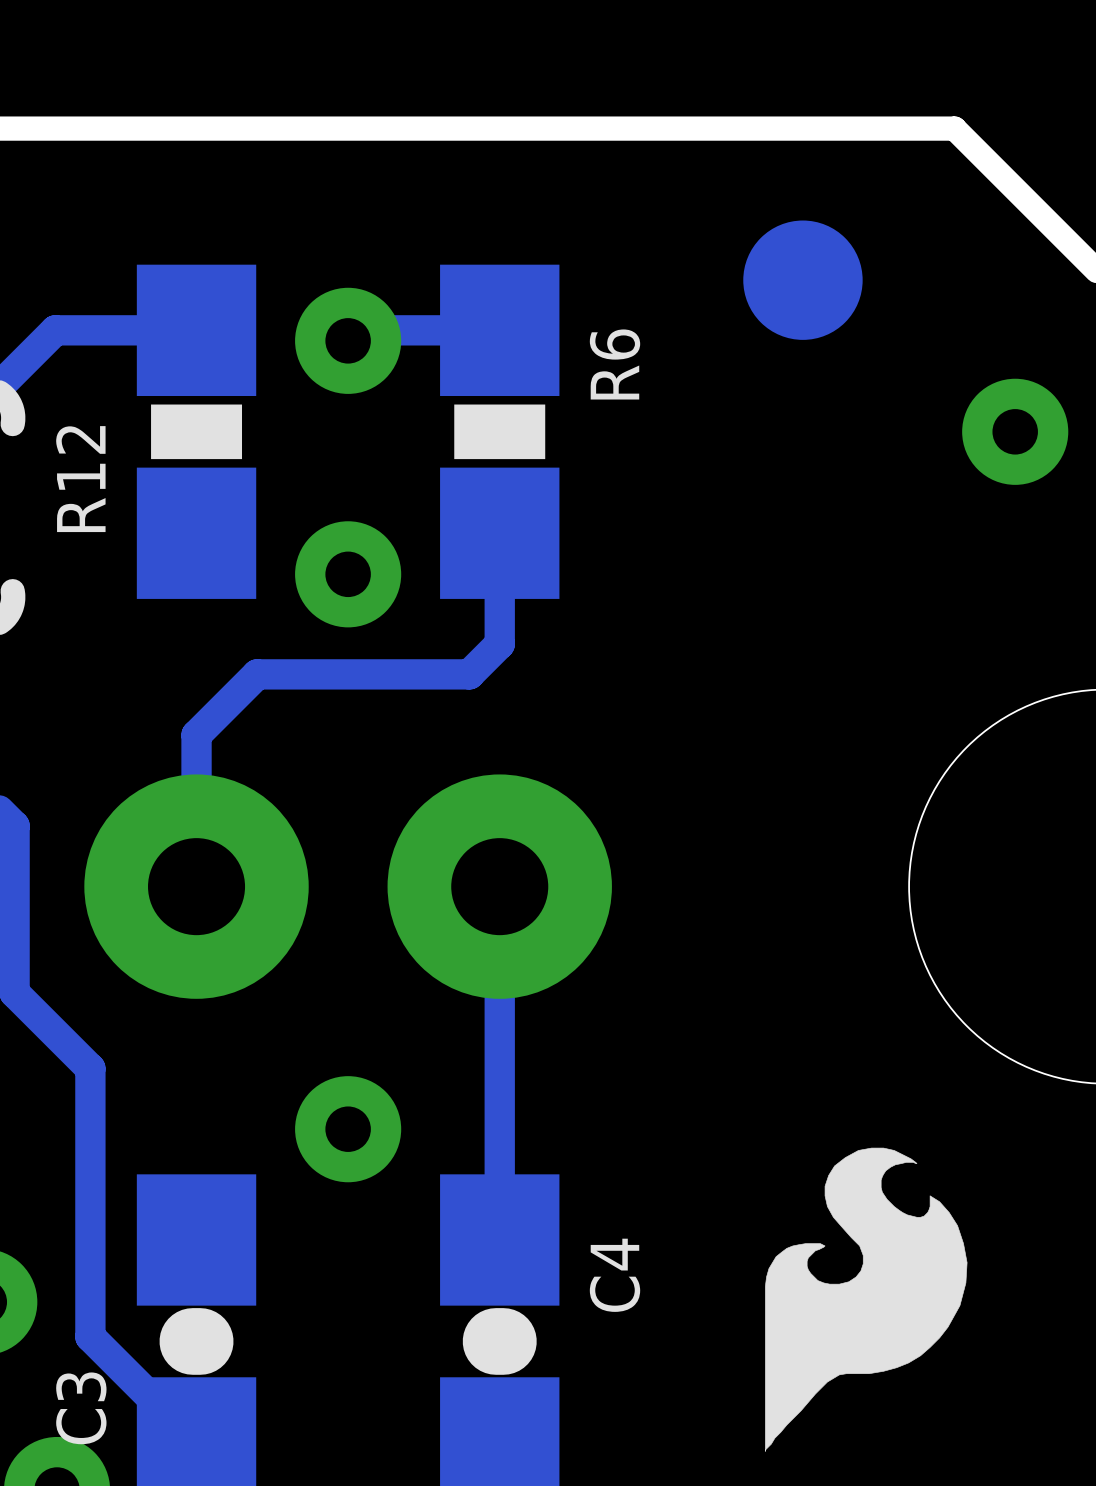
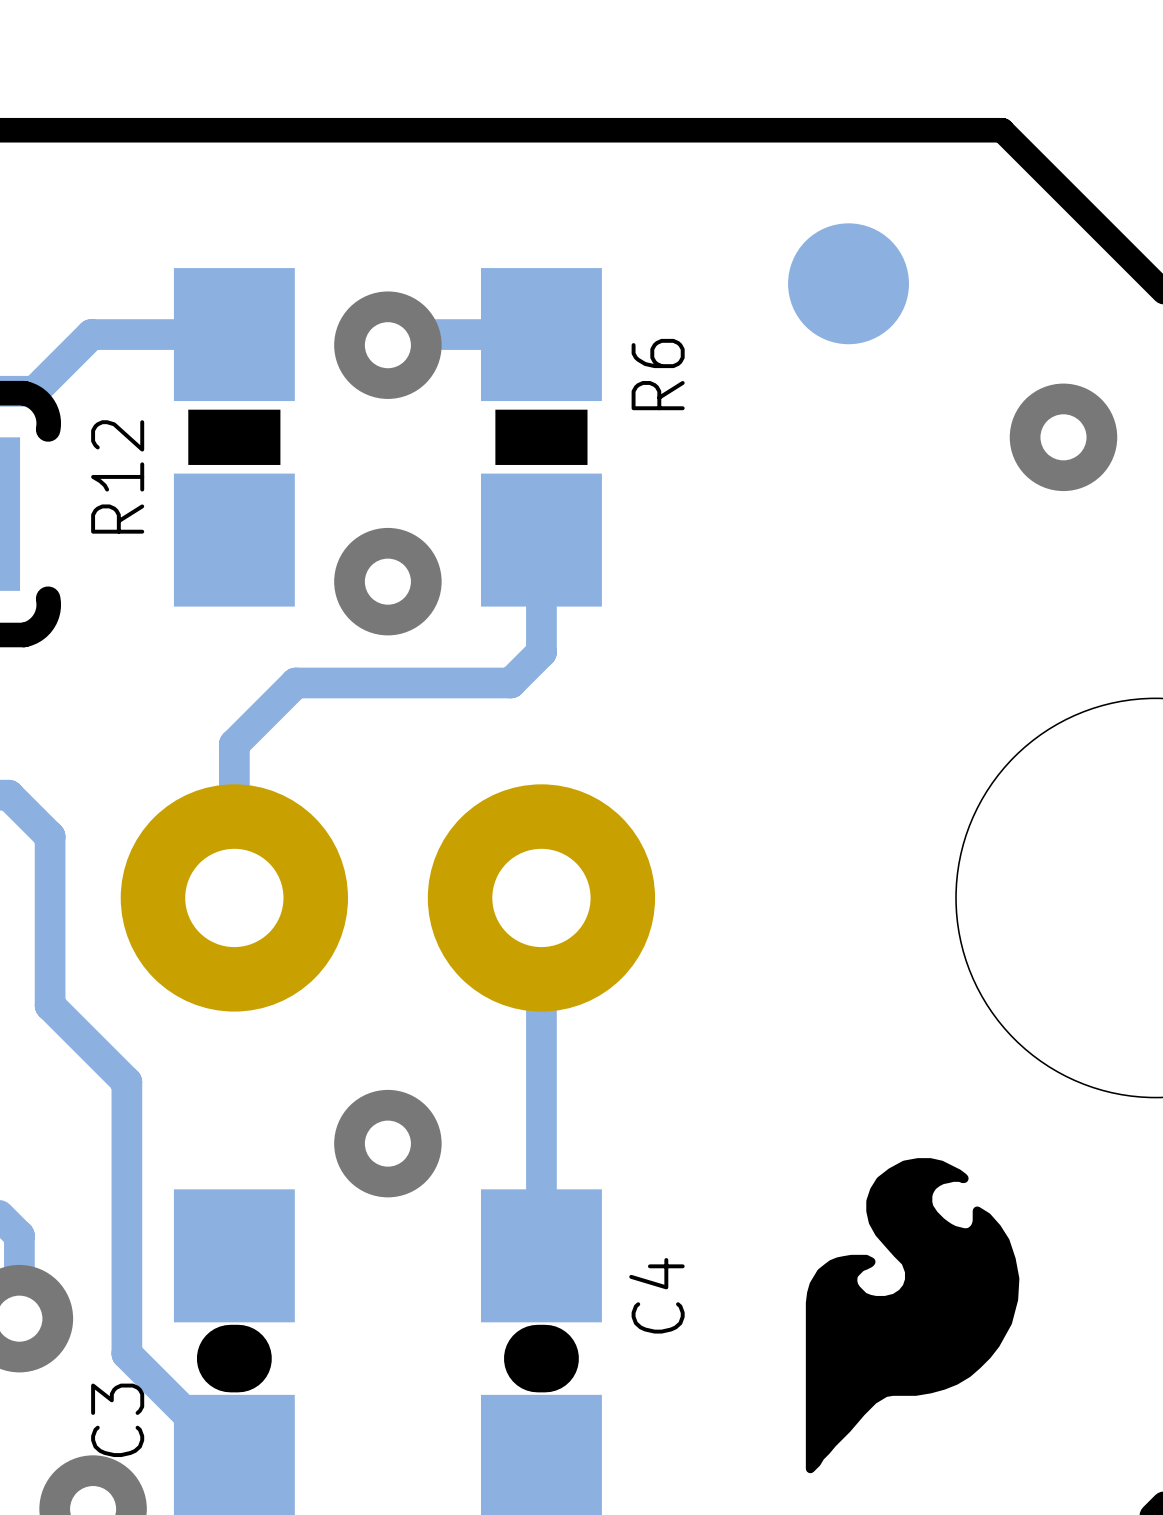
drawing shape: [765, 1147, 968, 1452] -> [805, 1158, 1020, 1474]

